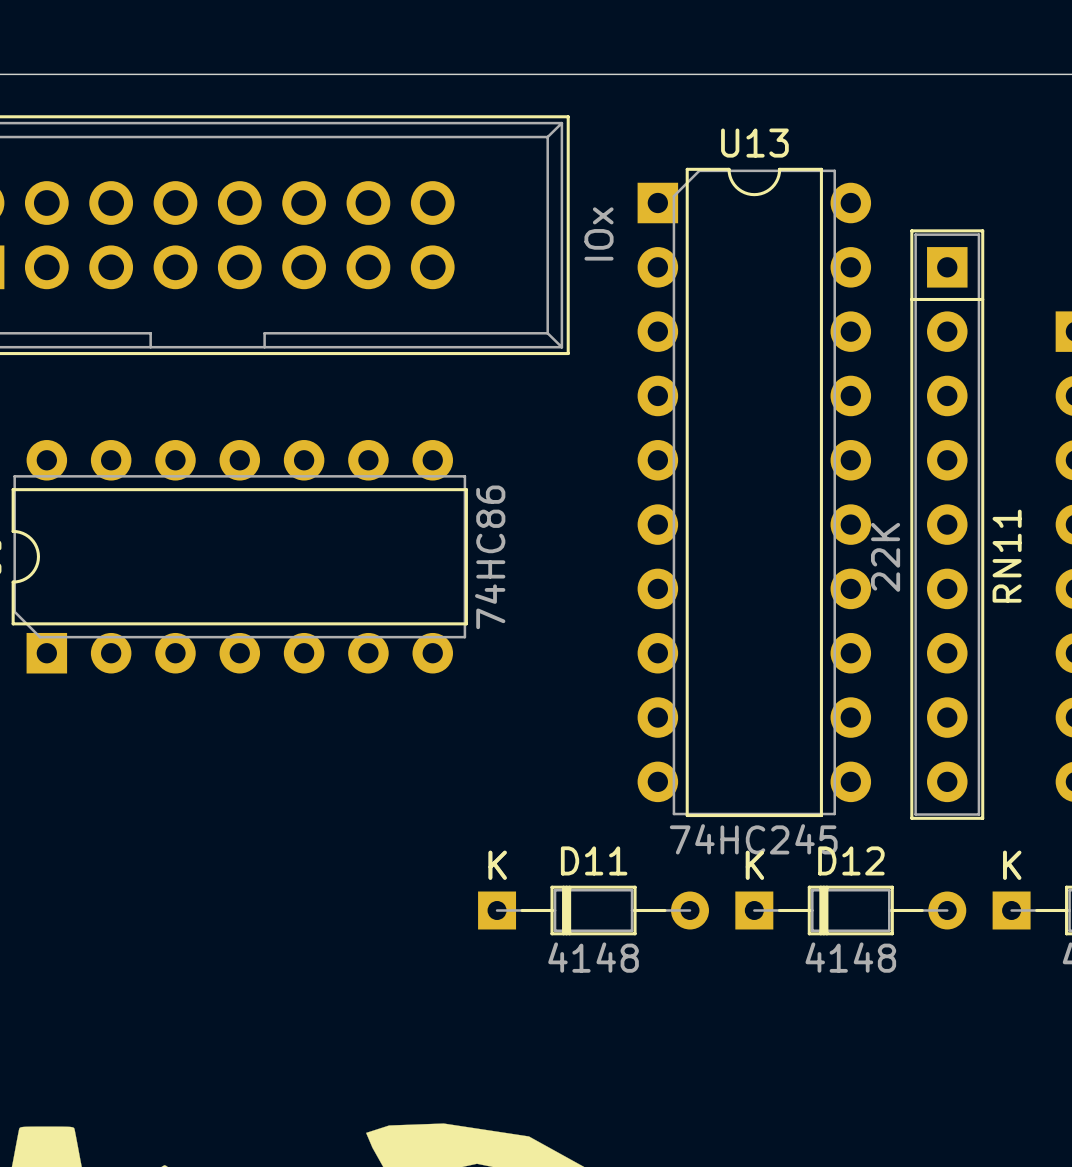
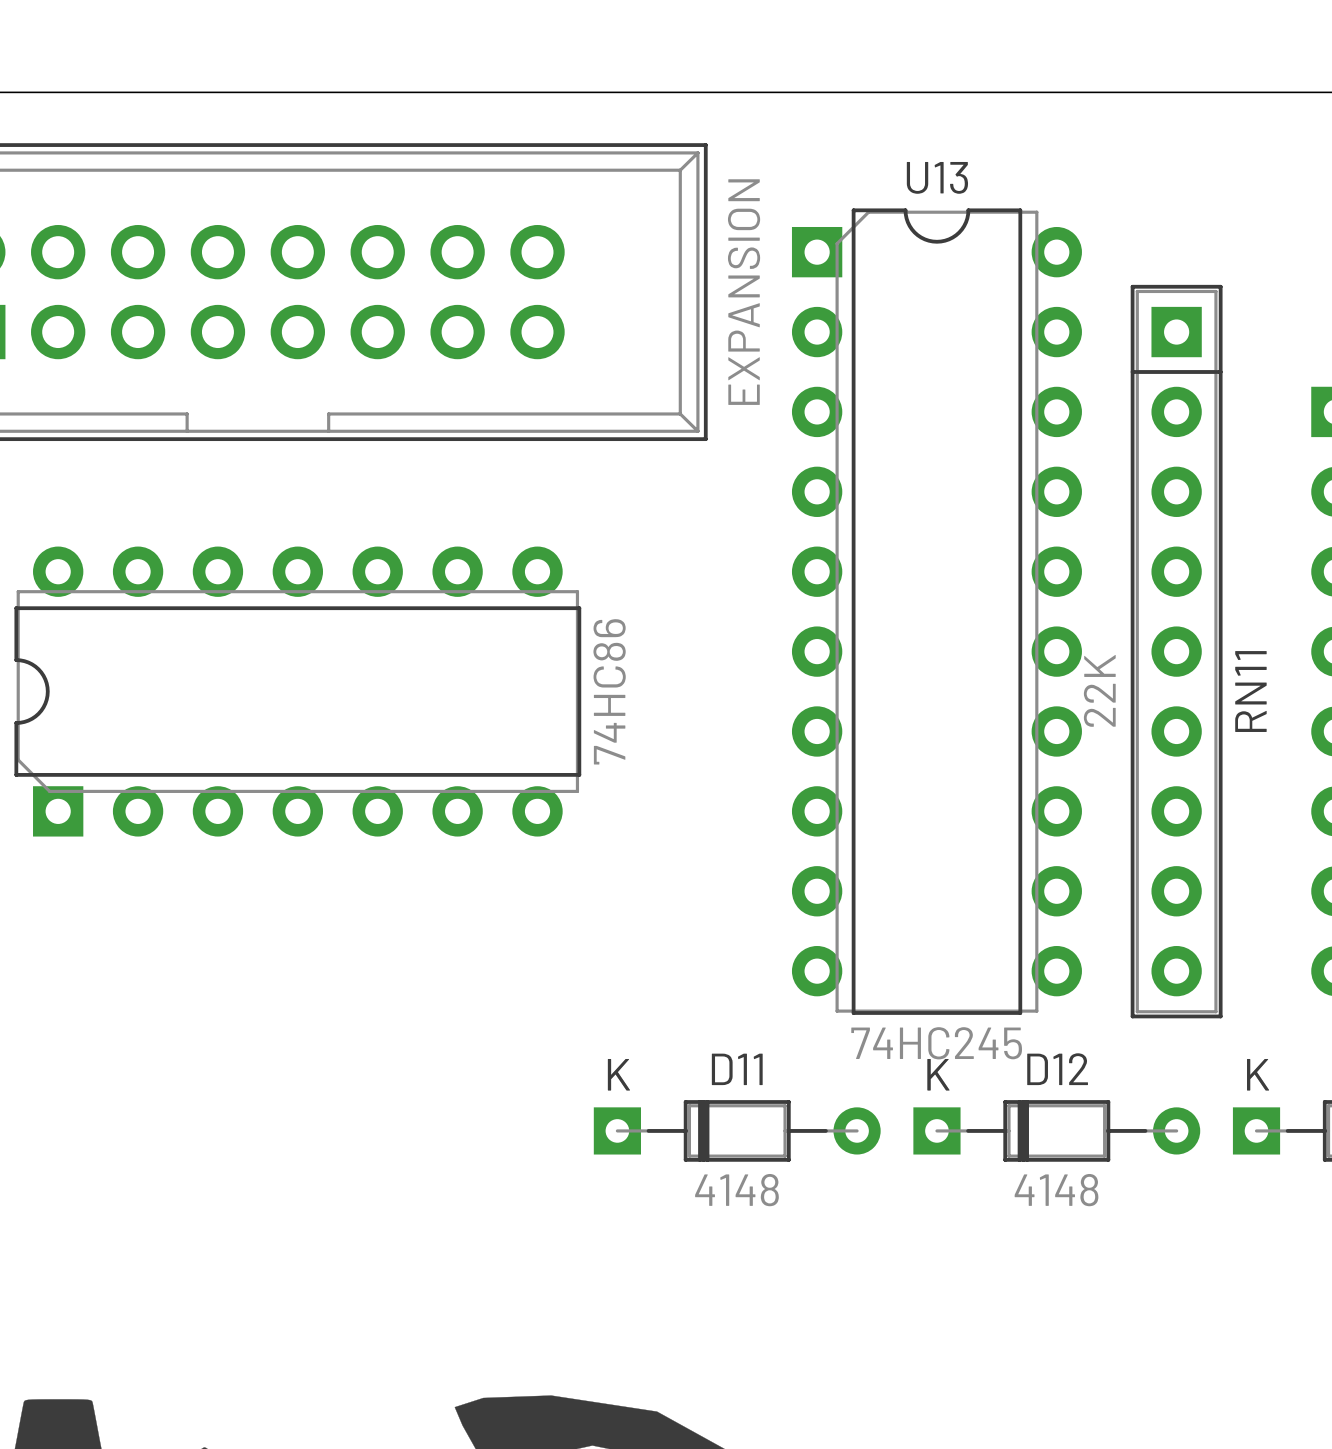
part value: IOx (599, 233) -> EXPANSION (744, 292)

